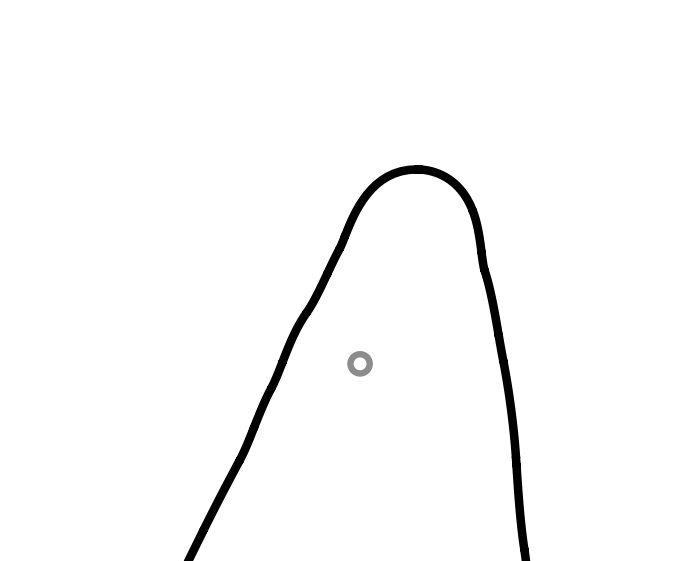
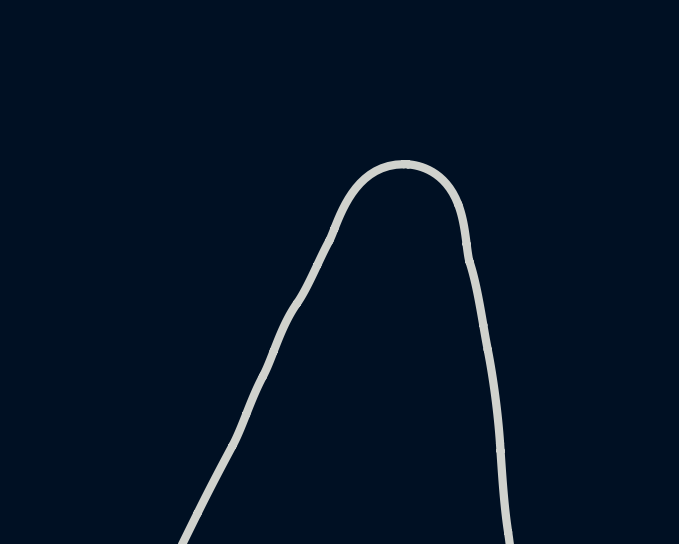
via: (360, 363) -> none

